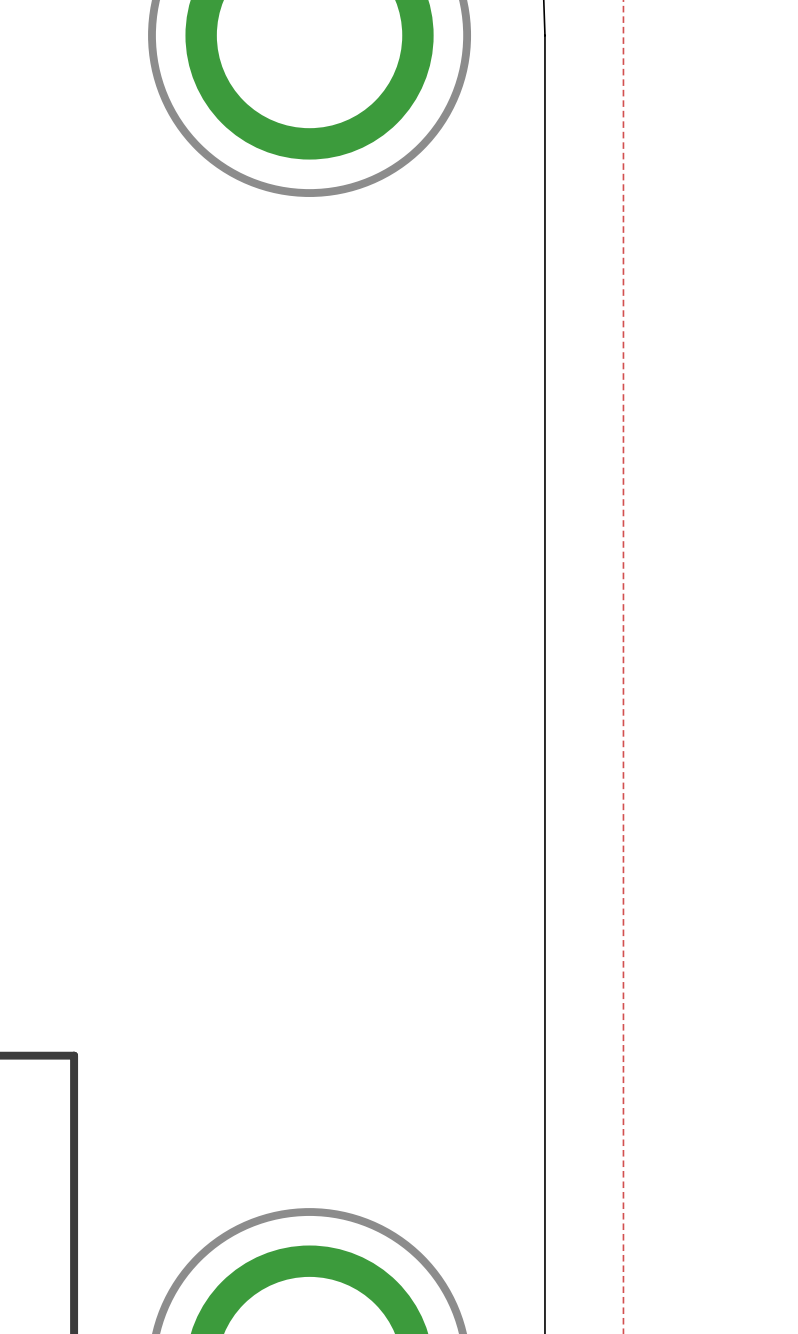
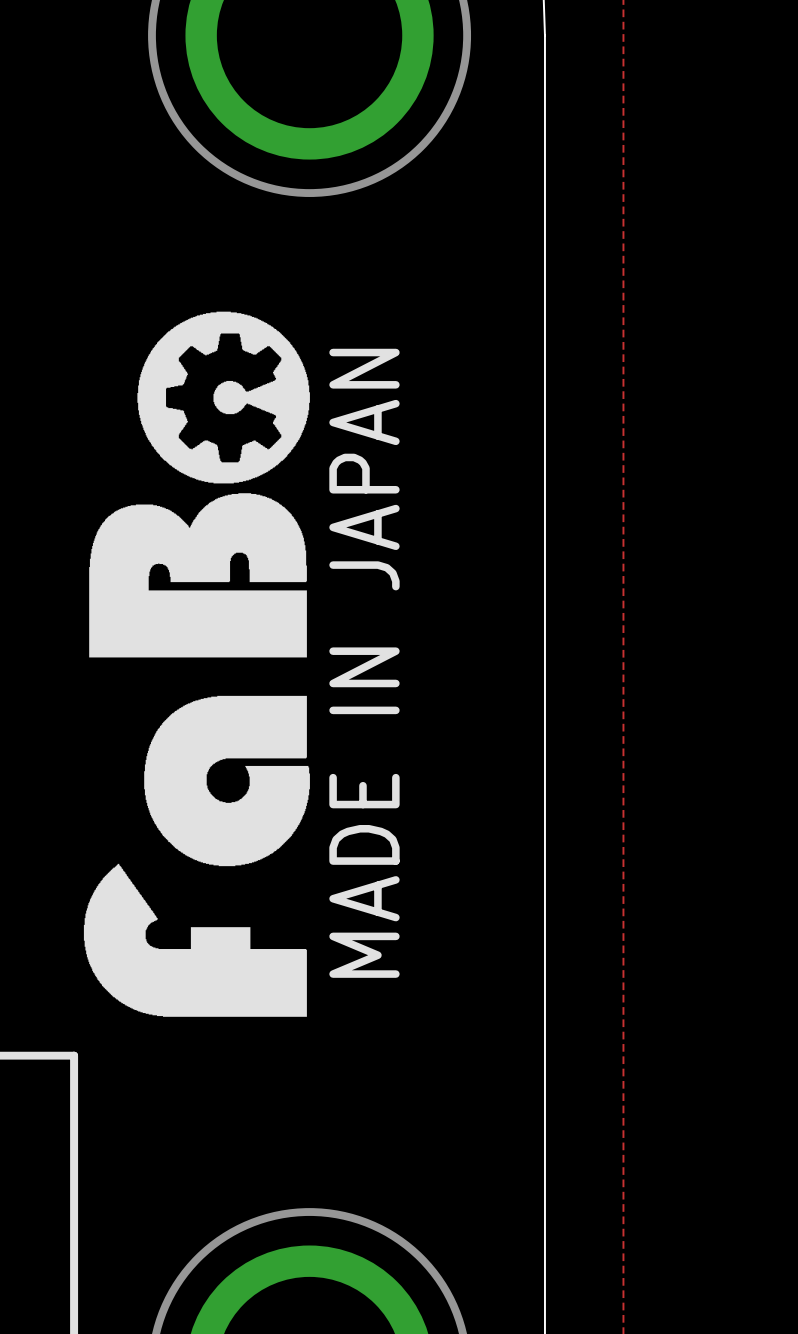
drawing: none -> [83, 311, 310, 1017]
text: none -> MADE IN JAPAN (364, 663)

